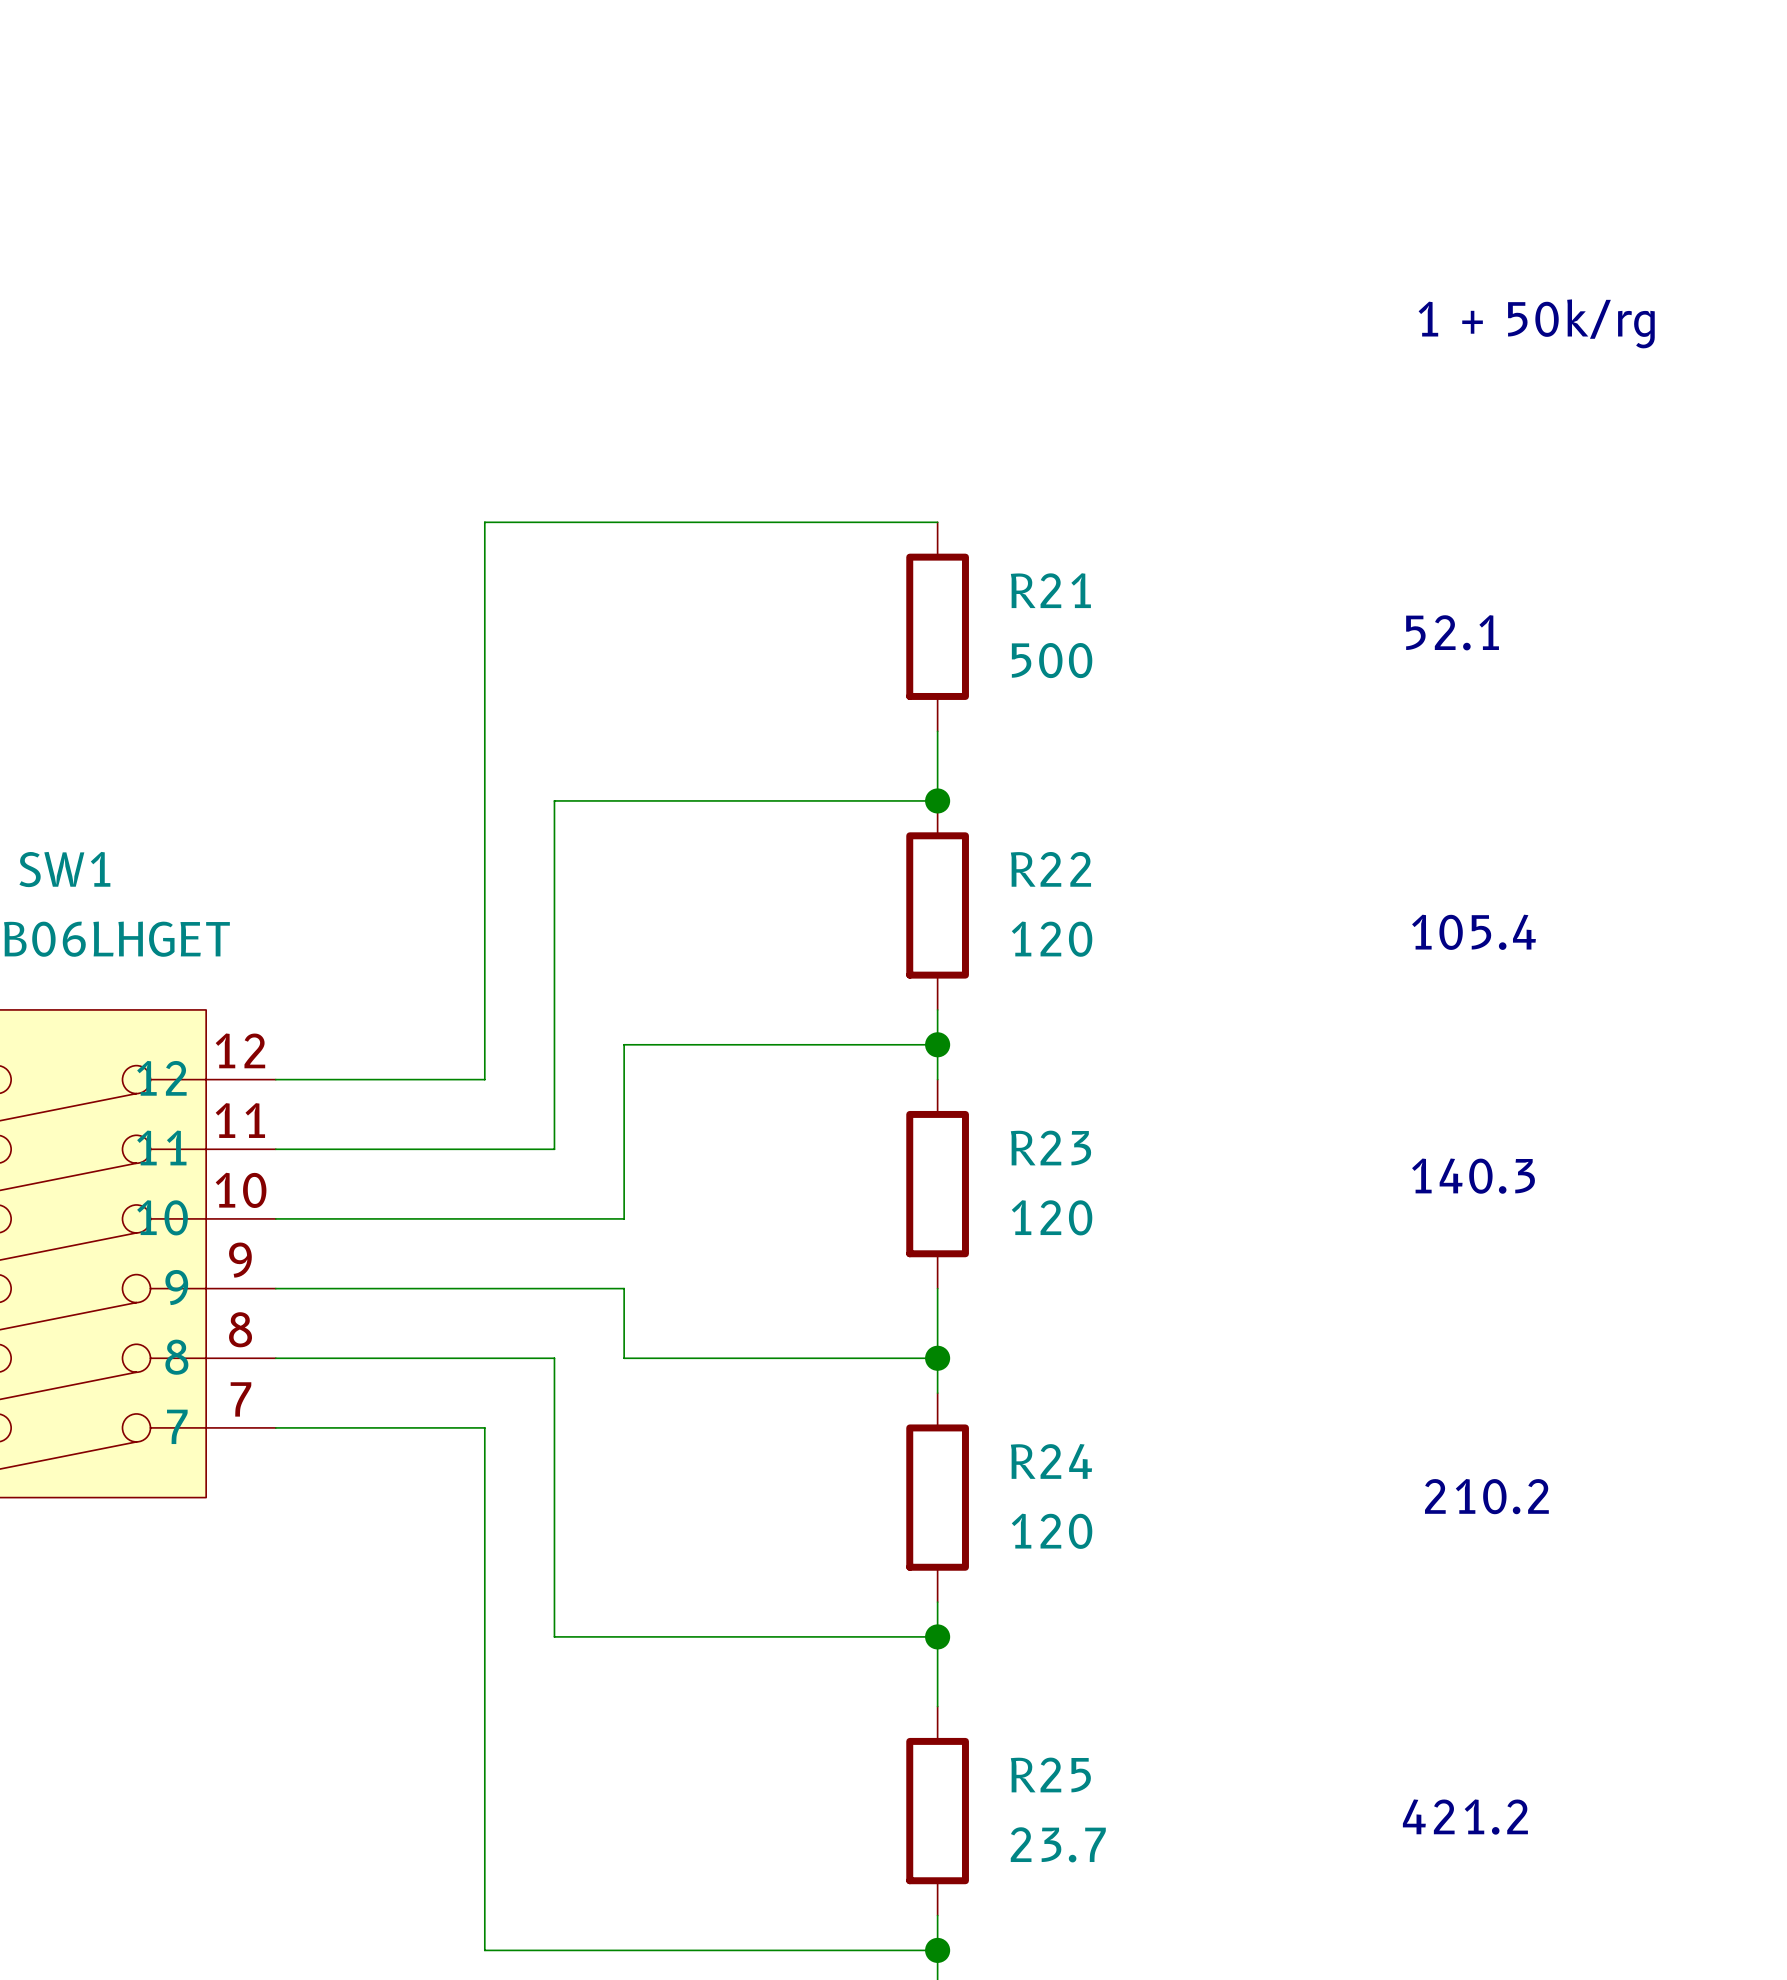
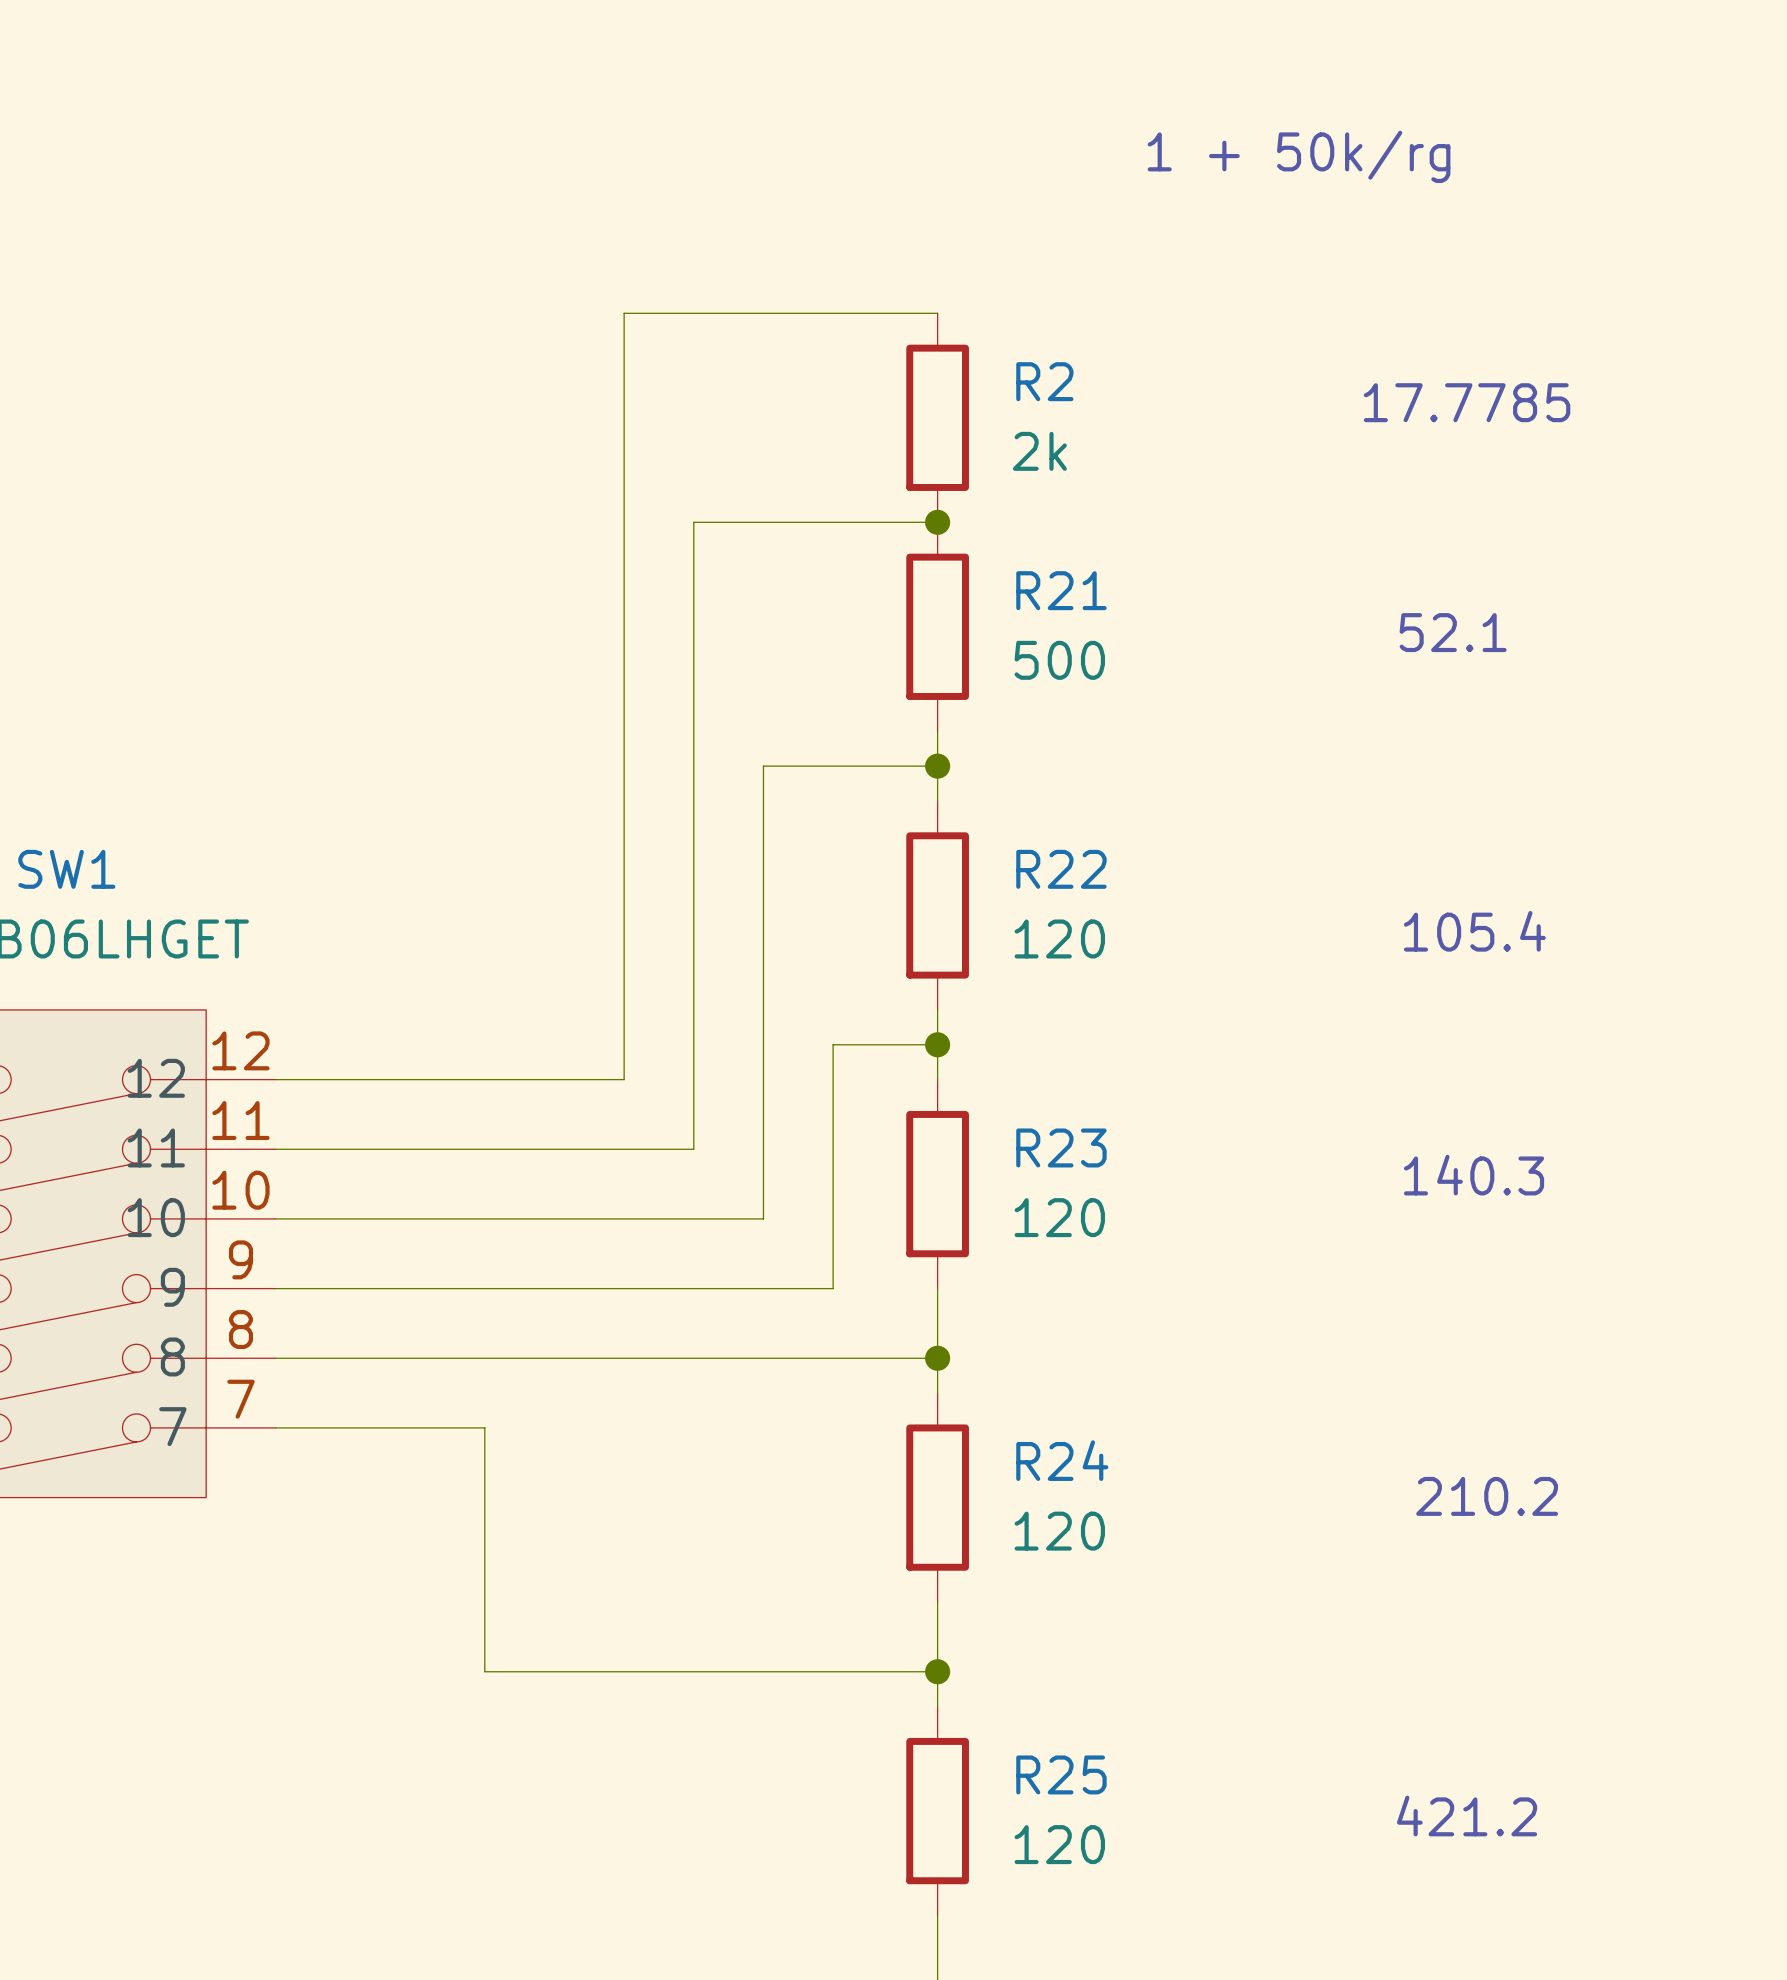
wire: none -> (937, 313) (624, 313) (624, 1044)
text position: 1 + 50k/rg (1536, 323) -> 1 + 50k/rg (1299, 156)
text: none -> 17.7785 (1467, 402)
R2: none -> 2k (937, 417)
wire: (693, 522) (484, 522) (484, 1079) -> (693, 522) (693, 1149) (554, 1149)
junction: none -> (937, 522)
wire: none -> (937, 766) (763, 766) (763, 1218) (624, 1218)
wire: (937, 800) (554, 800) (554, 1149) -> none
junction position: (937, 800) -> (937, 766)
wire: (624, 1044) (833, 1044) -> (624, 1288) (833, 1288) (833, 1044)
wire: (624, 1079) (624, 1218) -> (624, 1079) (484, 1079)
wire: (624, 1288) (624, 1358) -> (554, 1358) (624, 1358)
wire: (554, 1358) (554, 1636) (937, 1636) -> none
junction position: (937, 1636) -> (937, 1671)
wire: (484, 1671) (484, 1950) (937, 1950) -> (484, 1671) (937, 1671)
R25 value: 23.7 (1058, 1844) -> 120 (1059, 1844)
junction: (937, 1950) -> none

